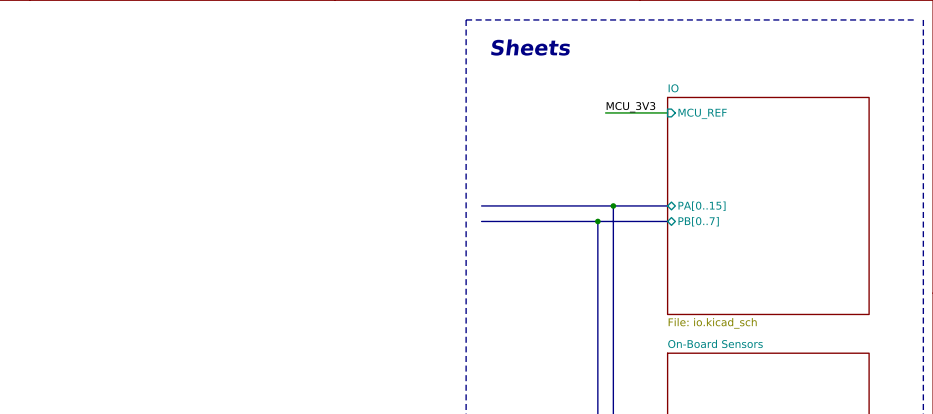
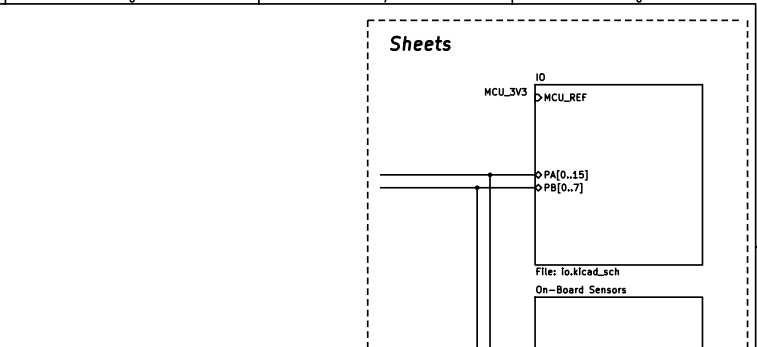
wire: (605, 112) (667, 112) -> none

